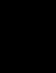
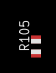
R105: none -> (35, 46)

